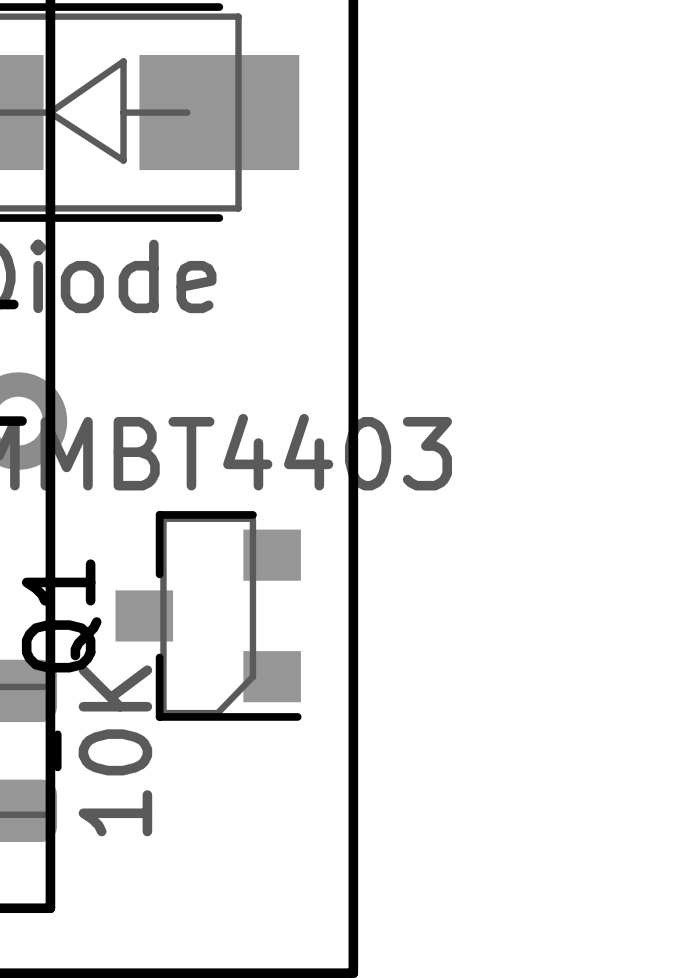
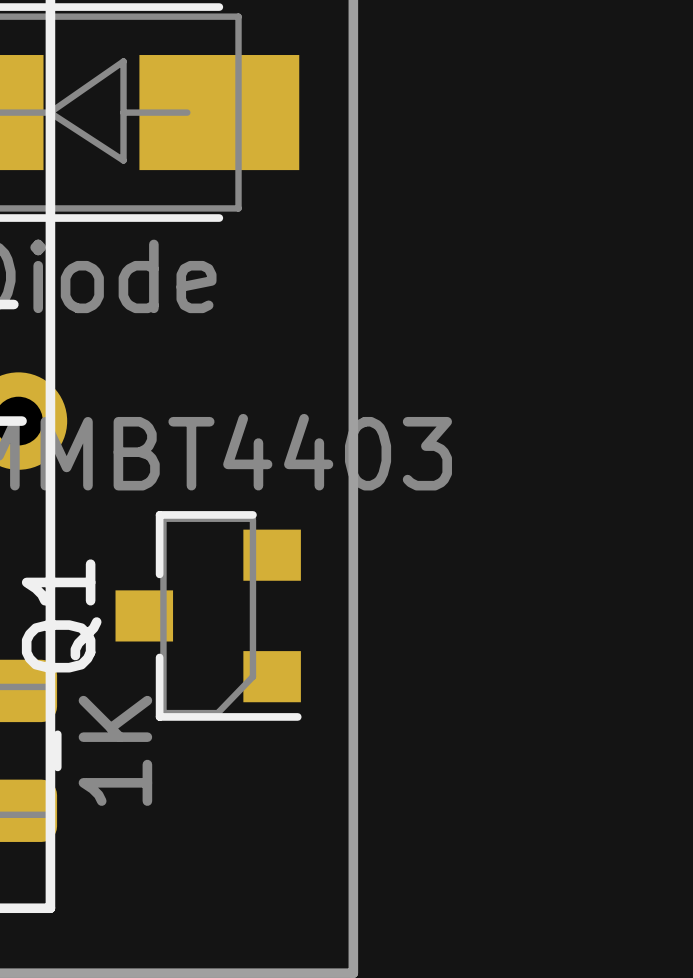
part value: 10K (115, 750) -> 1K (115, 750)

